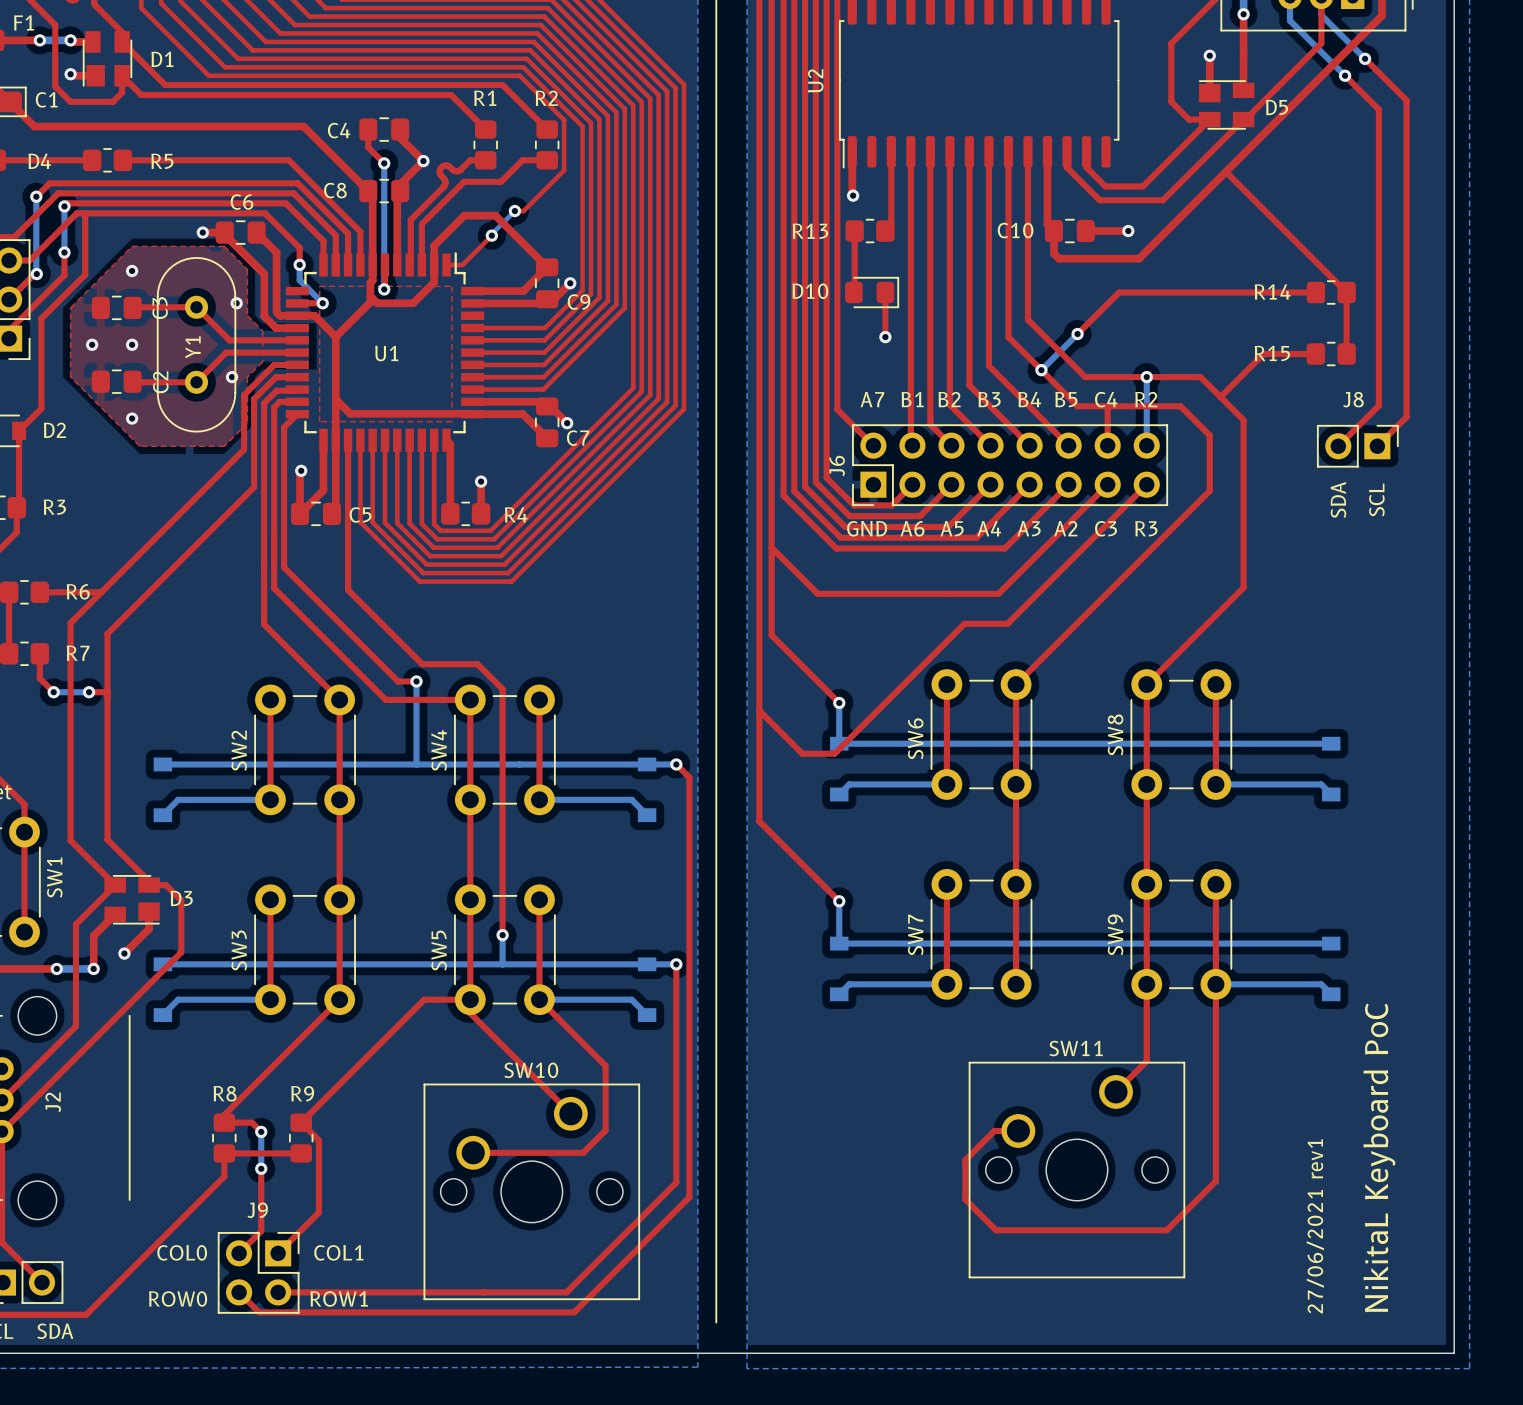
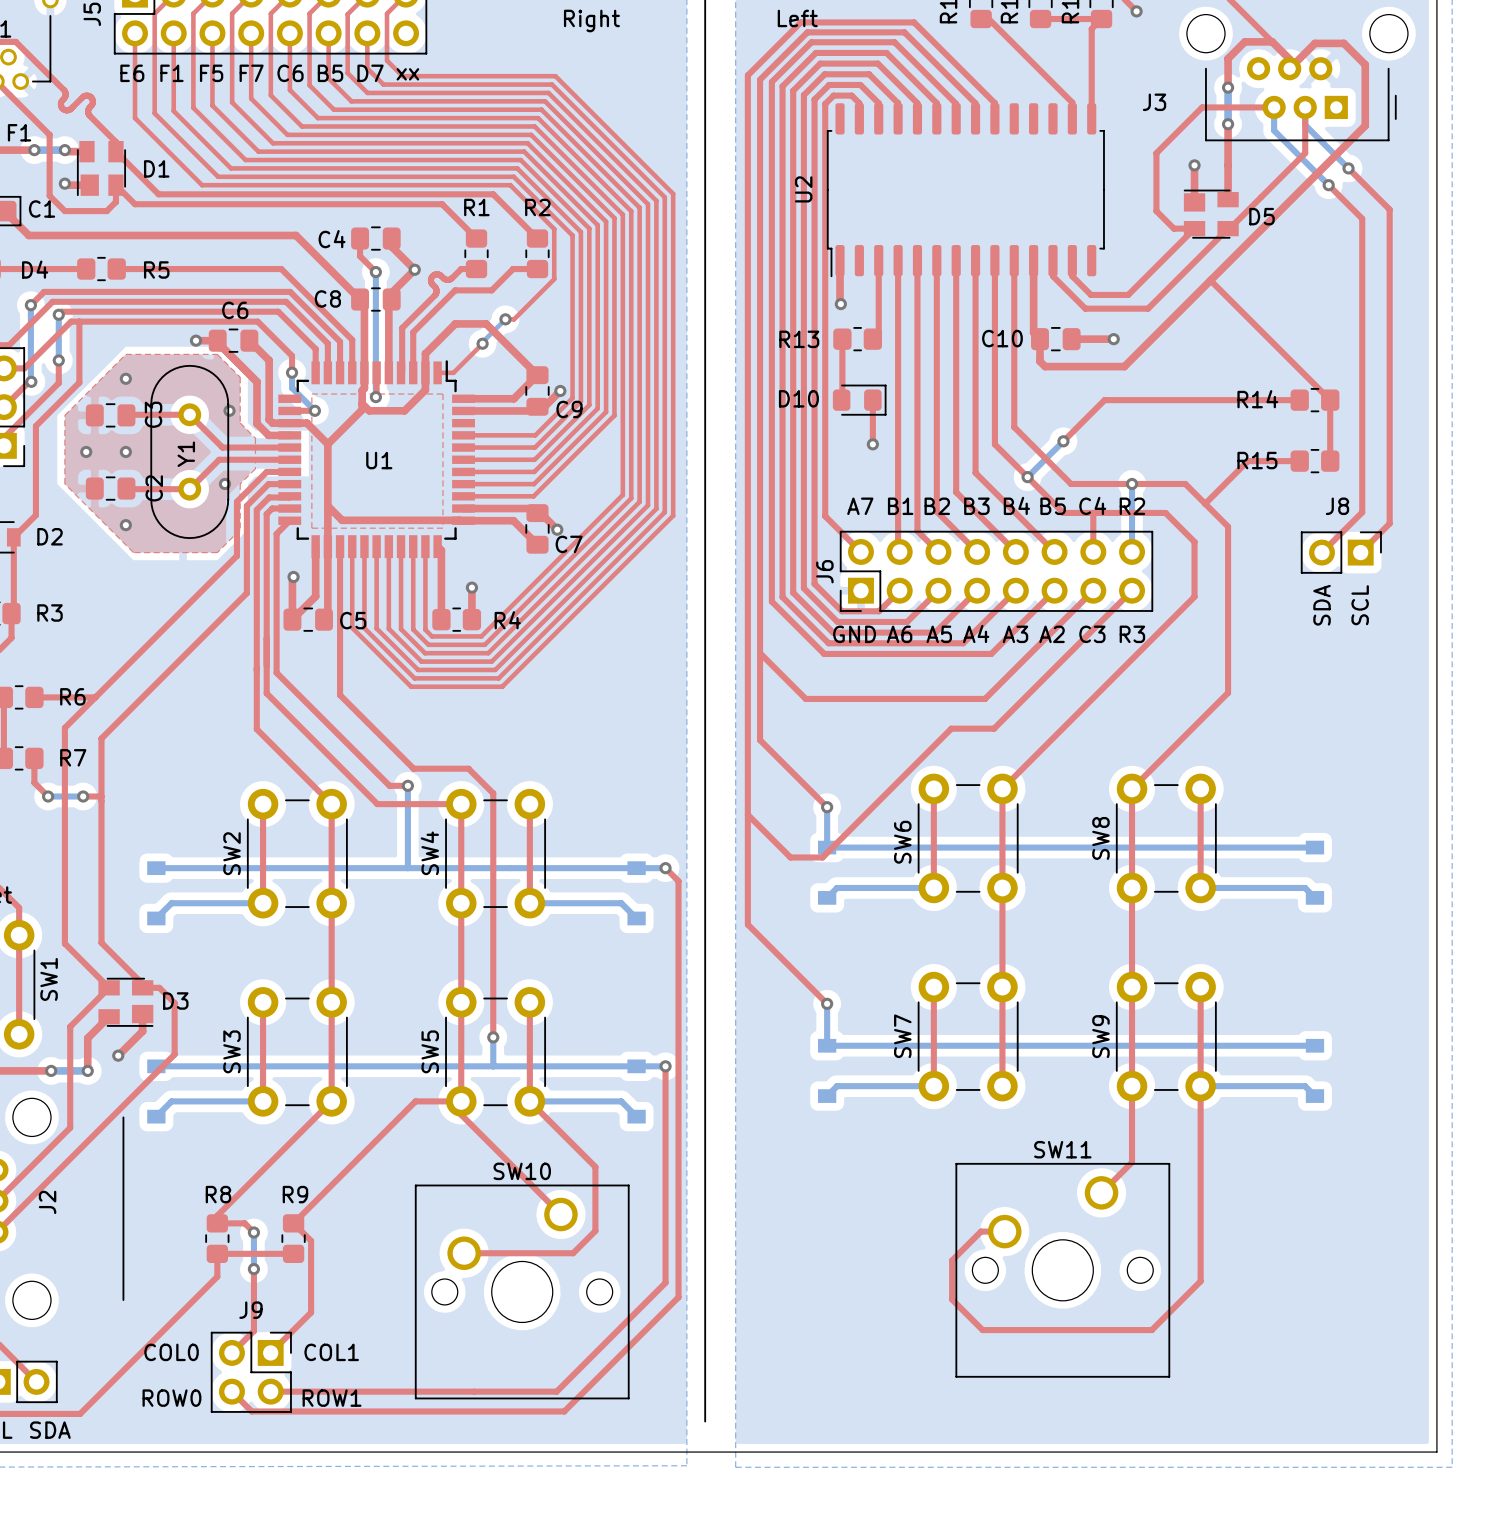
text: NikitaL Keyboard PoC (1379, 1157) -> none
text: 27/06/2021 rev1 (1315, 1226) -> none

